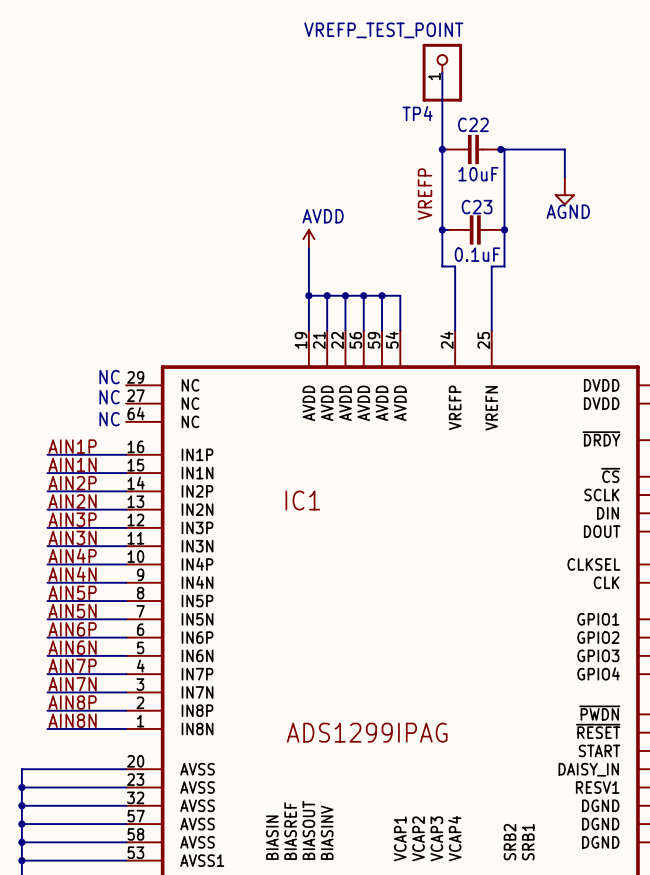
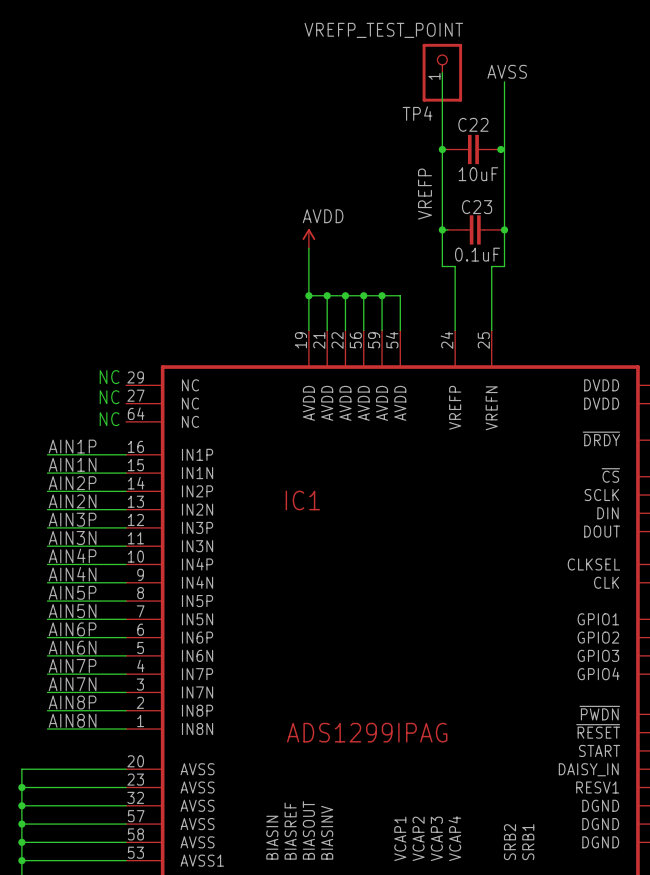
label: none -> AVSS (507, 71)
wire: (504, 149) (564, 149) (564, 176) -> (504, 149) (504, 81)
power symbol: AGND (564, 191) -> none

